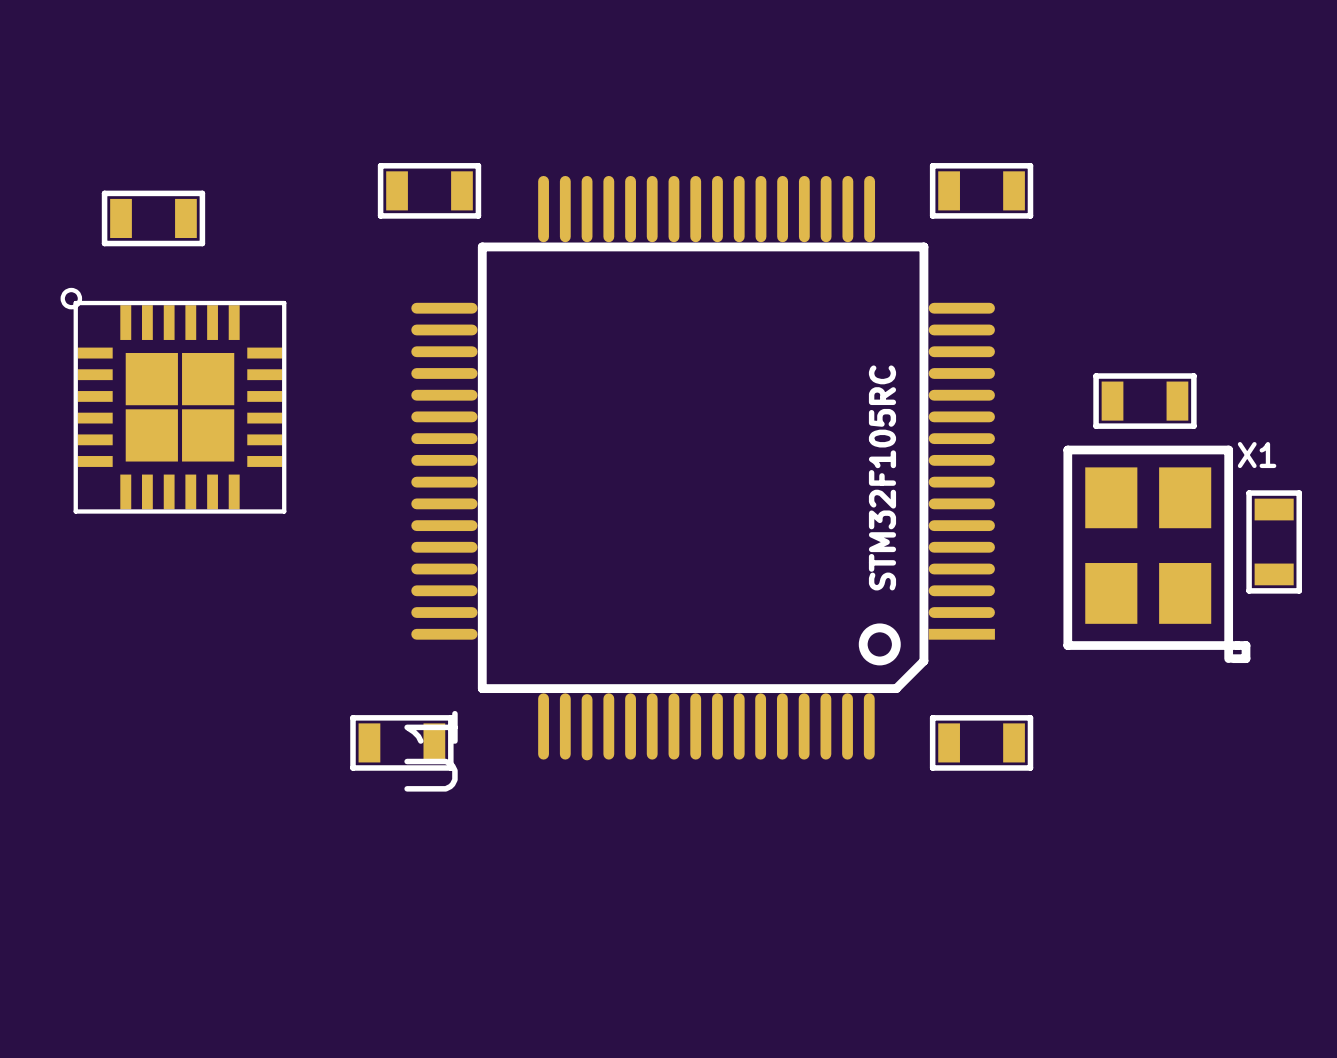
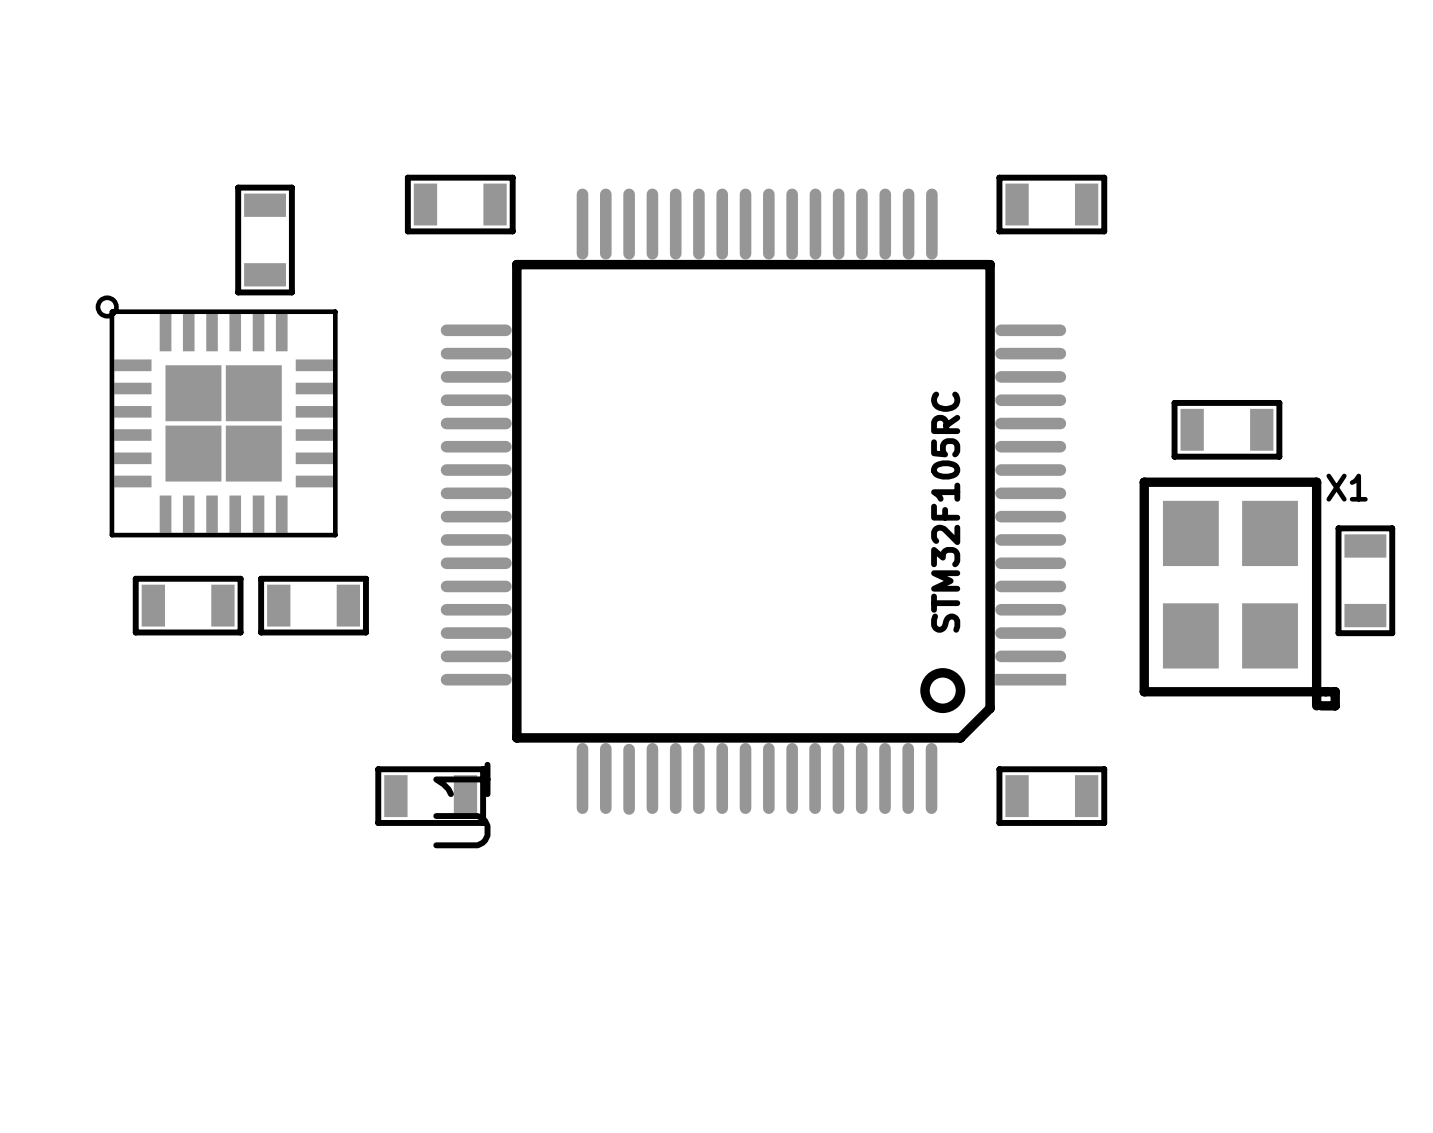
part rotation: 0° (153, 218) -> 90° clockwise (265, 240)
part position: (153, 218) -> (265, 240)
part position: (173, 400) -> (216, 416)
part: none -> (188, 605)
part: none -> (313, 605)

